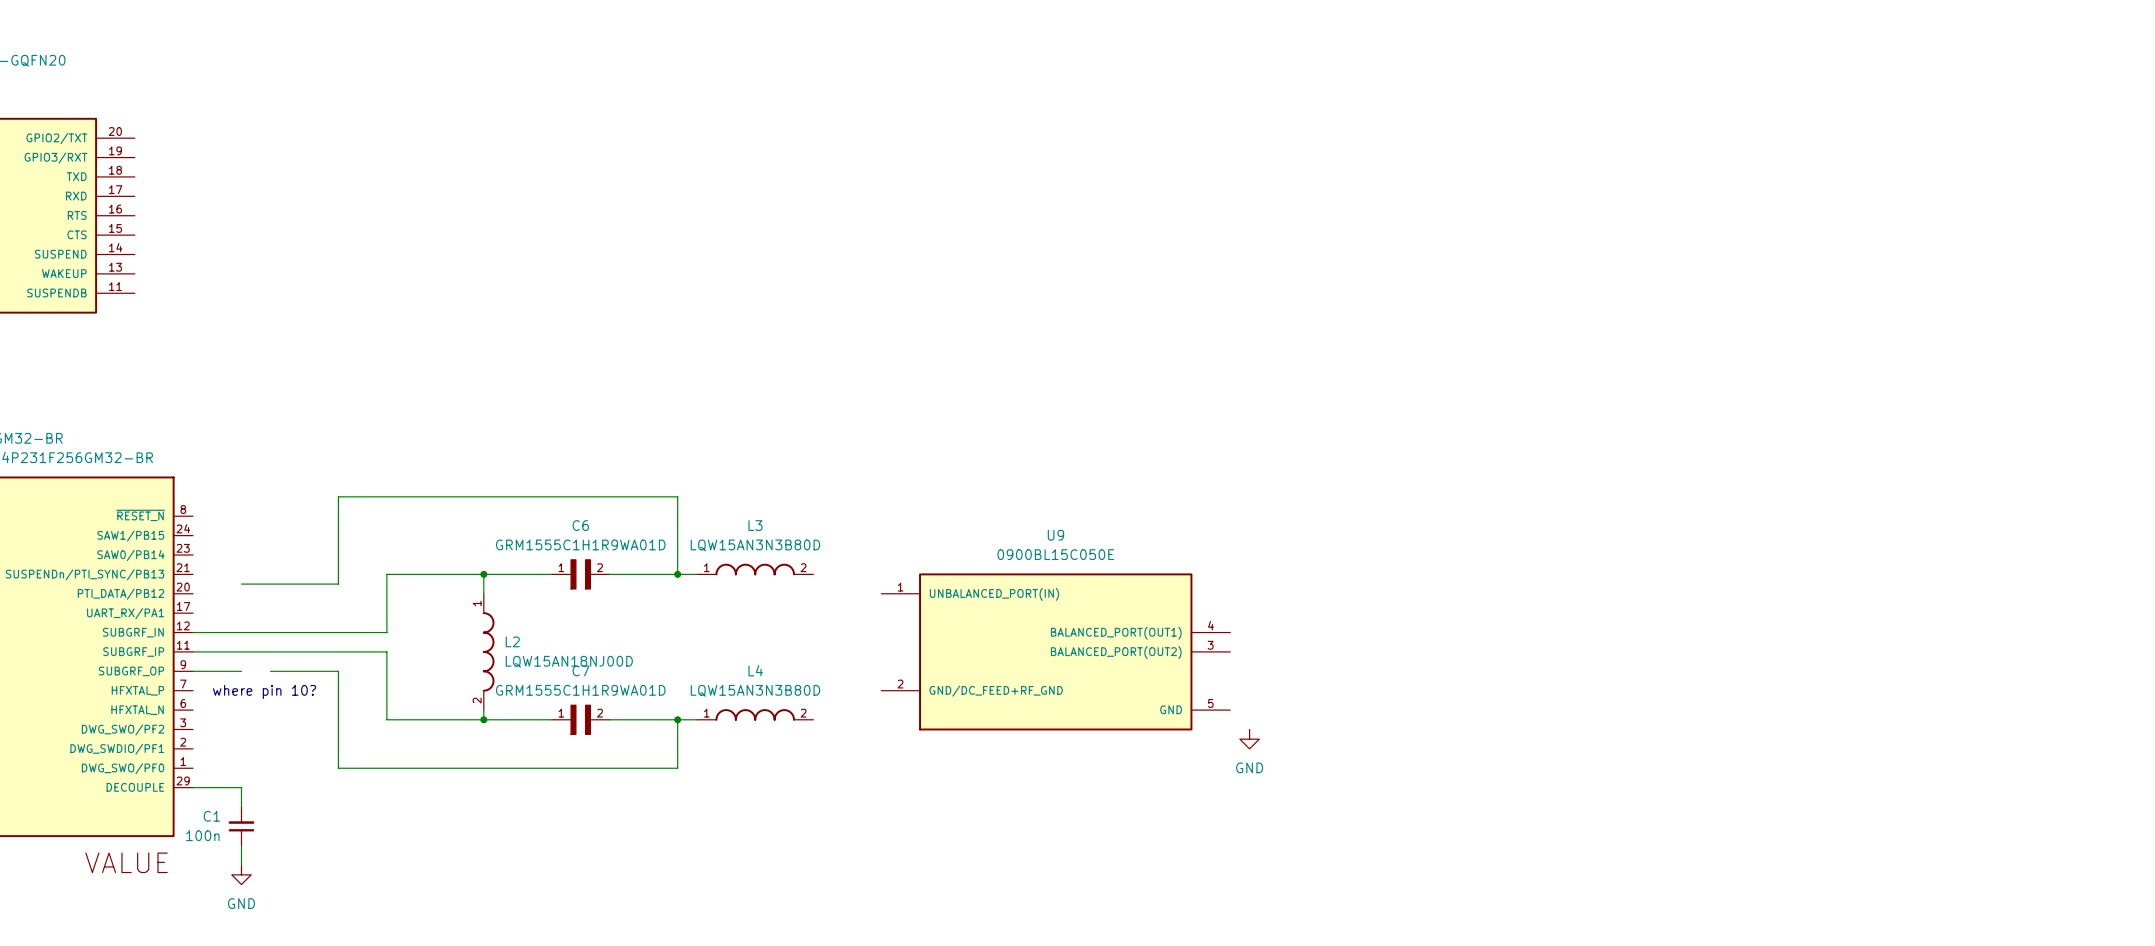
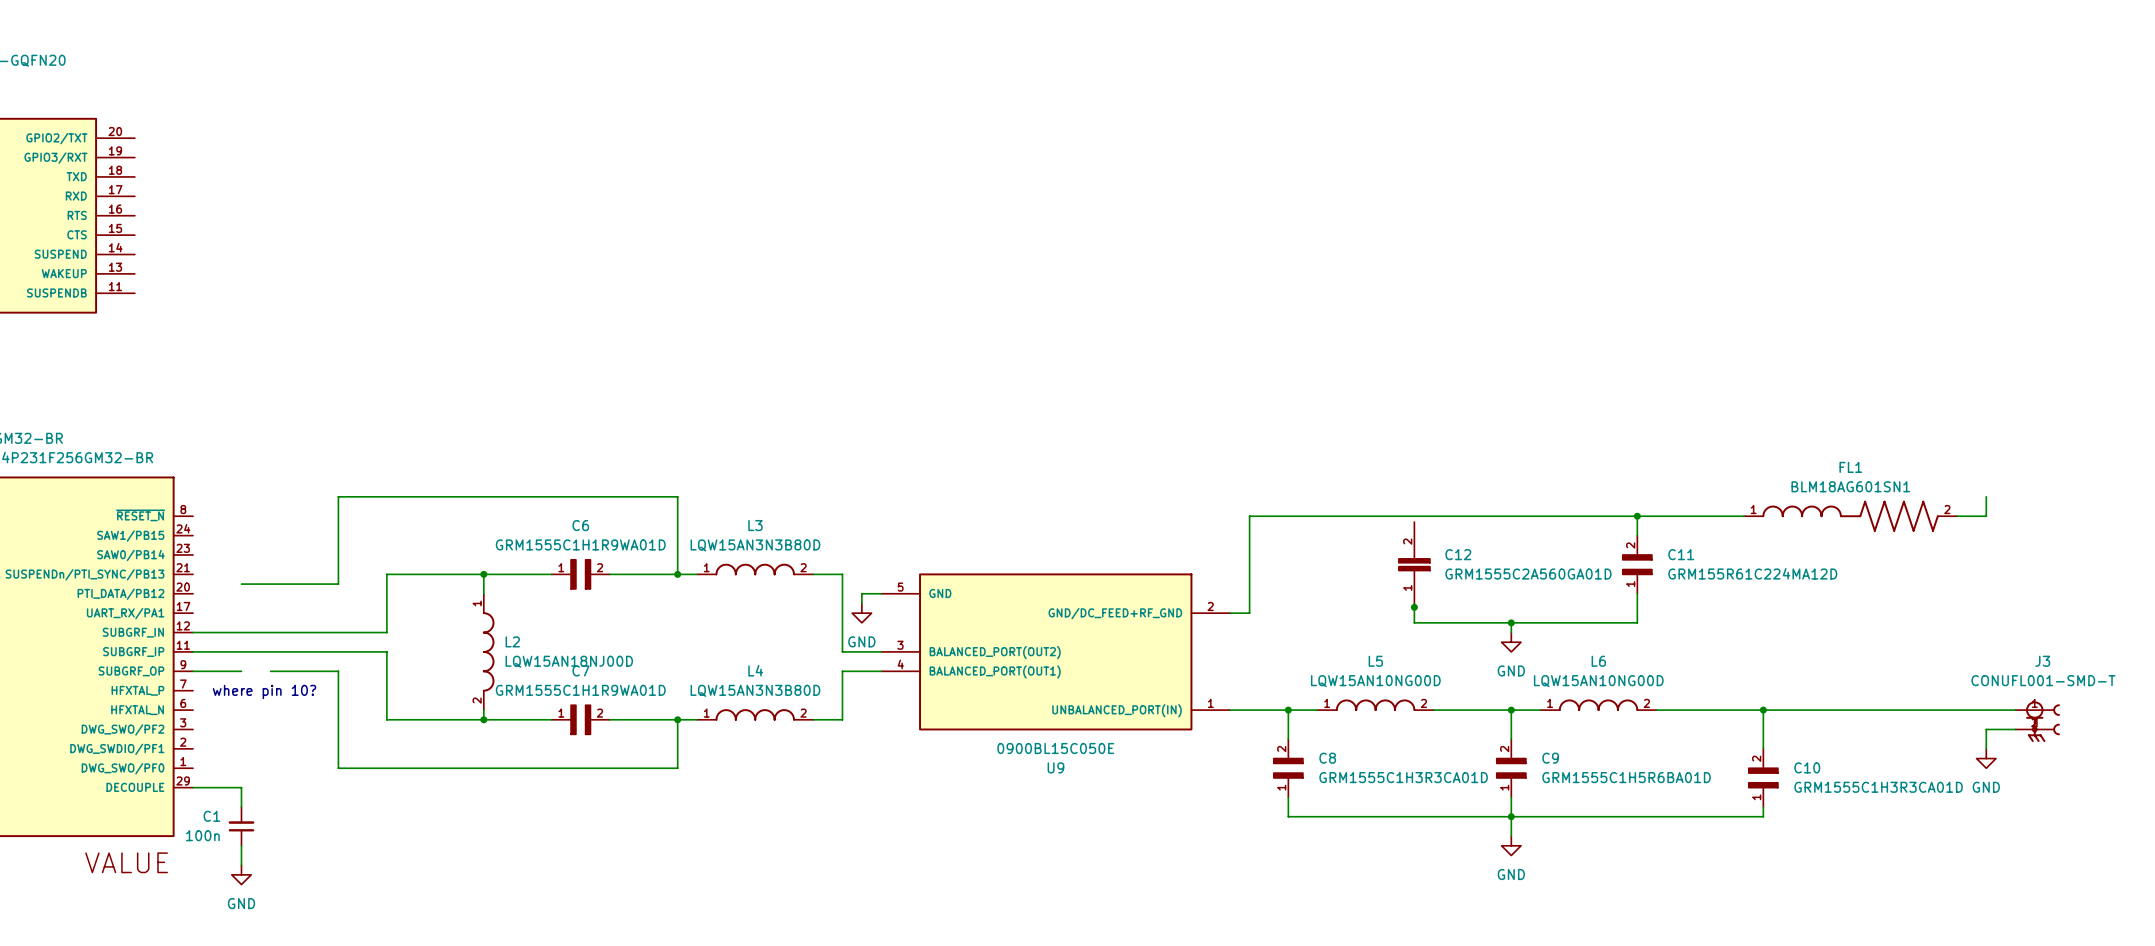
wire: none -> (1986, 496) (1986, 516) (1957, 516)
wire: none -> (1637, 516) (1637, 535)
junction: none -> (1637, 516)
wire: none -> (1743, 516) (1249, 516) (1249, 613) (1230, 613)
FL1: none -> BLM18AG601SN1 (1850, 516)
C12: none -> GRM1555C2A560GA01D (1414, 564)
C11: none -> GRM155R61C224MA12D (1637, 564)
wire: none -> (813, 574) (842, 574) (842, 651) (881, 651)
wire: none -> (881, 593) (861, 593) (861, 603)
wire: none -> (1637, 593) (1637, 622) (1414, 622) (1414, 603)
junction: none -> (1414, 607)
power symbol: none -> GND (861, 613)
wire: none -> (1511, 622) (1511, 632)
junction: none -> (1511, 622)
power symbol: none -> GND (1511, 642)
U9 rotation: 0° (1055, 651) -> 180° (1055, 651)
wire: none -> (881, 671) (842, 671) (842, 719) (813, 719)
L5: none -> LQW15AN10NG00D (1375, 705)
L6: none -> LQW15AN10NG00D (1598, 705)
wire: none -> (1230, 710) (1317, 710)
wire: none -> (1288, 710) (1288, 739)
junction: none -> (1288, 710)
wire: none -> (1433, 710) (1540, 710)
wire: none -> (1511, 710) (1511, 739)
junction: none -> (1511, 710)
wire: none -> (1656, 710) (2015, 710)
wire: none -> (1763, 710) (1763, 748)
junction: none -> (1763, 710)
J3: none -> CONUFL001-SMD-T (2037, 721)
wire: none -> (2015, 729) (1986, 729) (1986, 748)
power symbol: GND (1249, 739) -> none
power symbol: none -> GND (1986, 758)
C8: none -> GRM1555C1H3R3CA01D (1288, 768)
C9: none -> GRM1555C1H5R6BA01D (1511, 768)
C10: none -> GRM1555C1H3R3CA01D (1763, 777)
wire: none -> (1288, 797) (1288, 816) (1763, 816) (1763, 807)
wire: none -> (1511, 797) (1511, 836)
junction: none -> (1511, 816)
power symbol: none -> GND (1511, 845)

